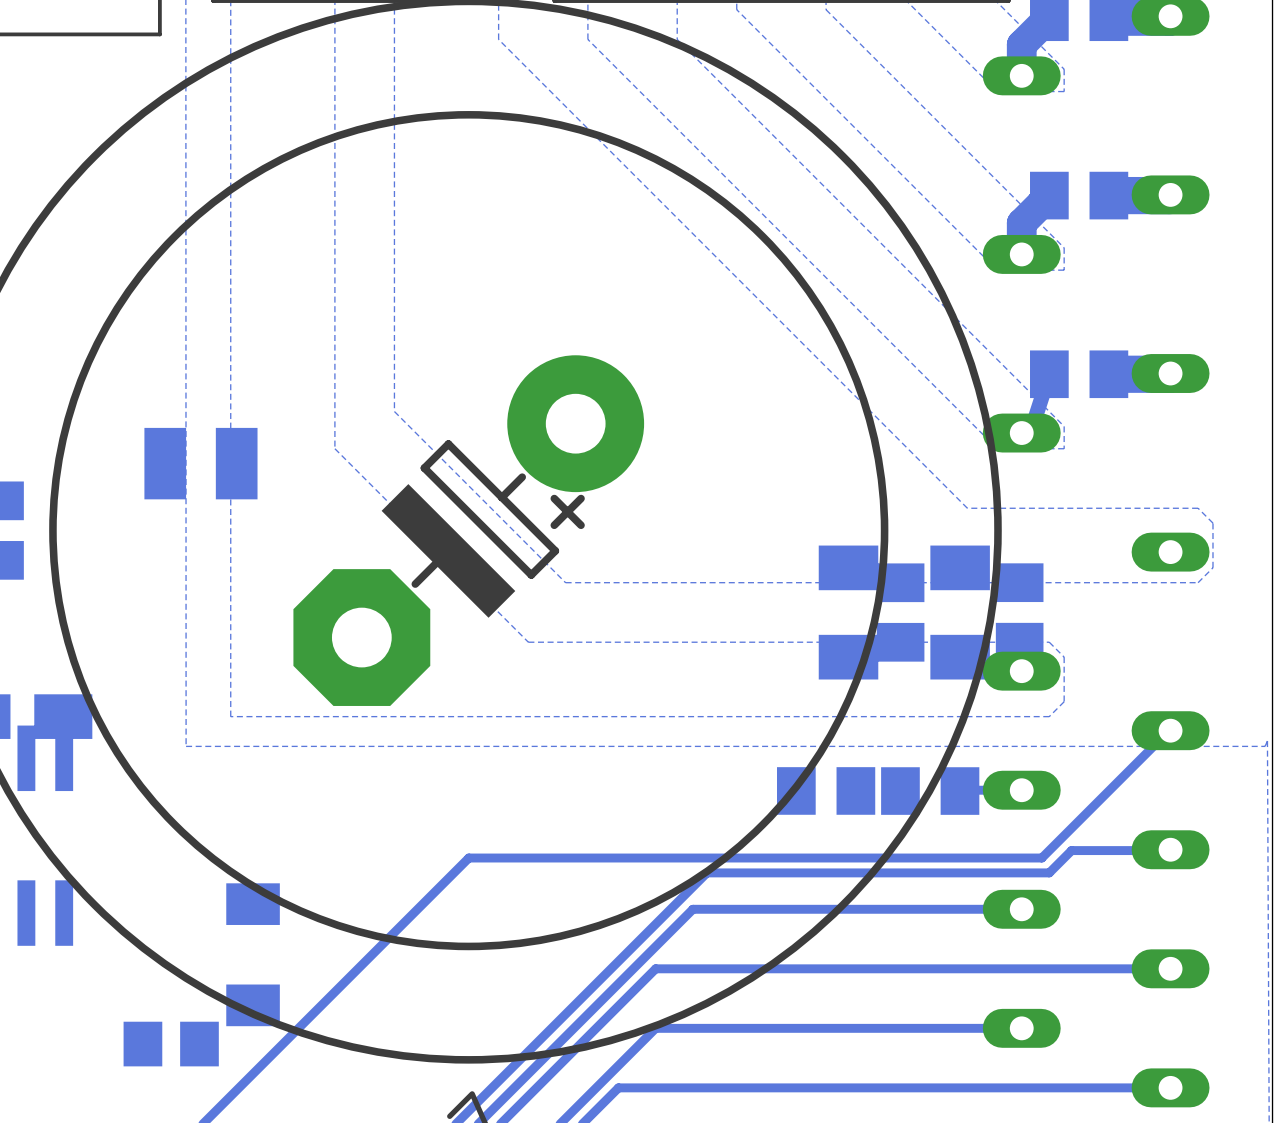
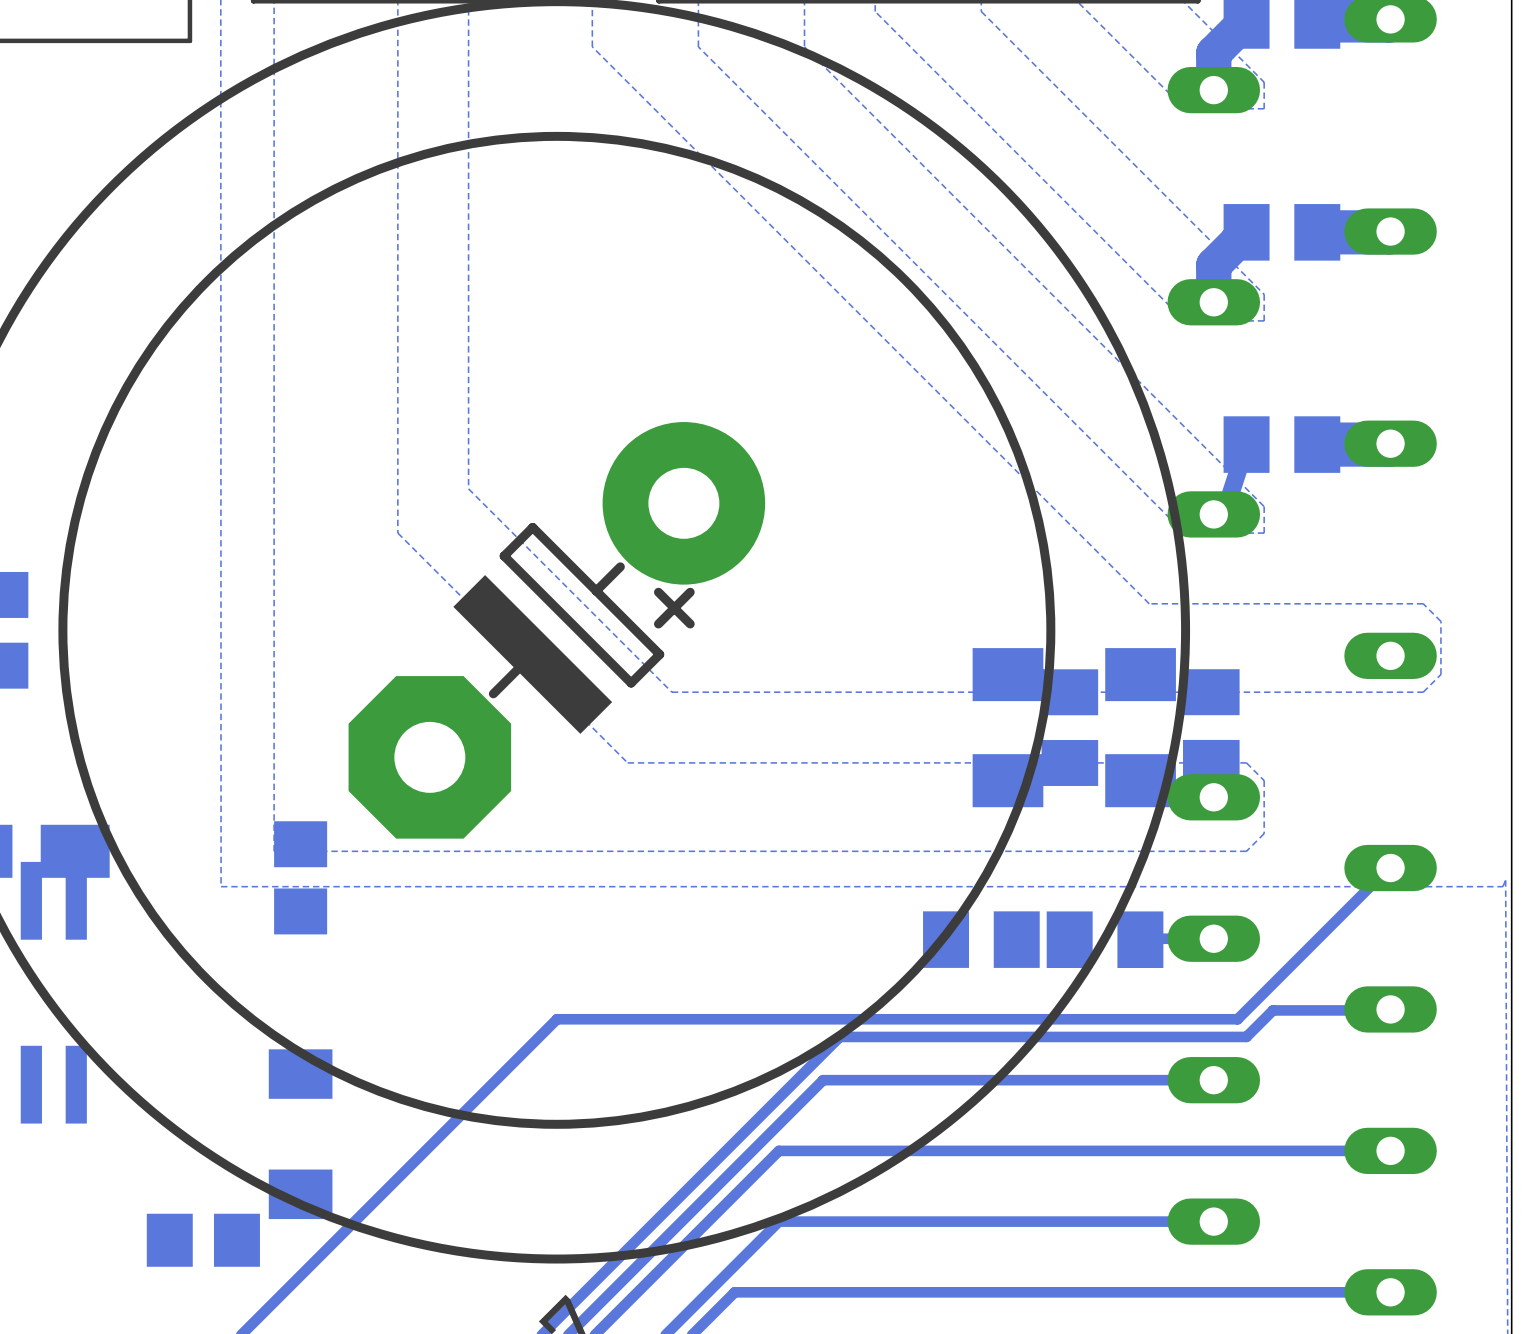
part: (200, 463) -> none
part: none -> (300, 877)

